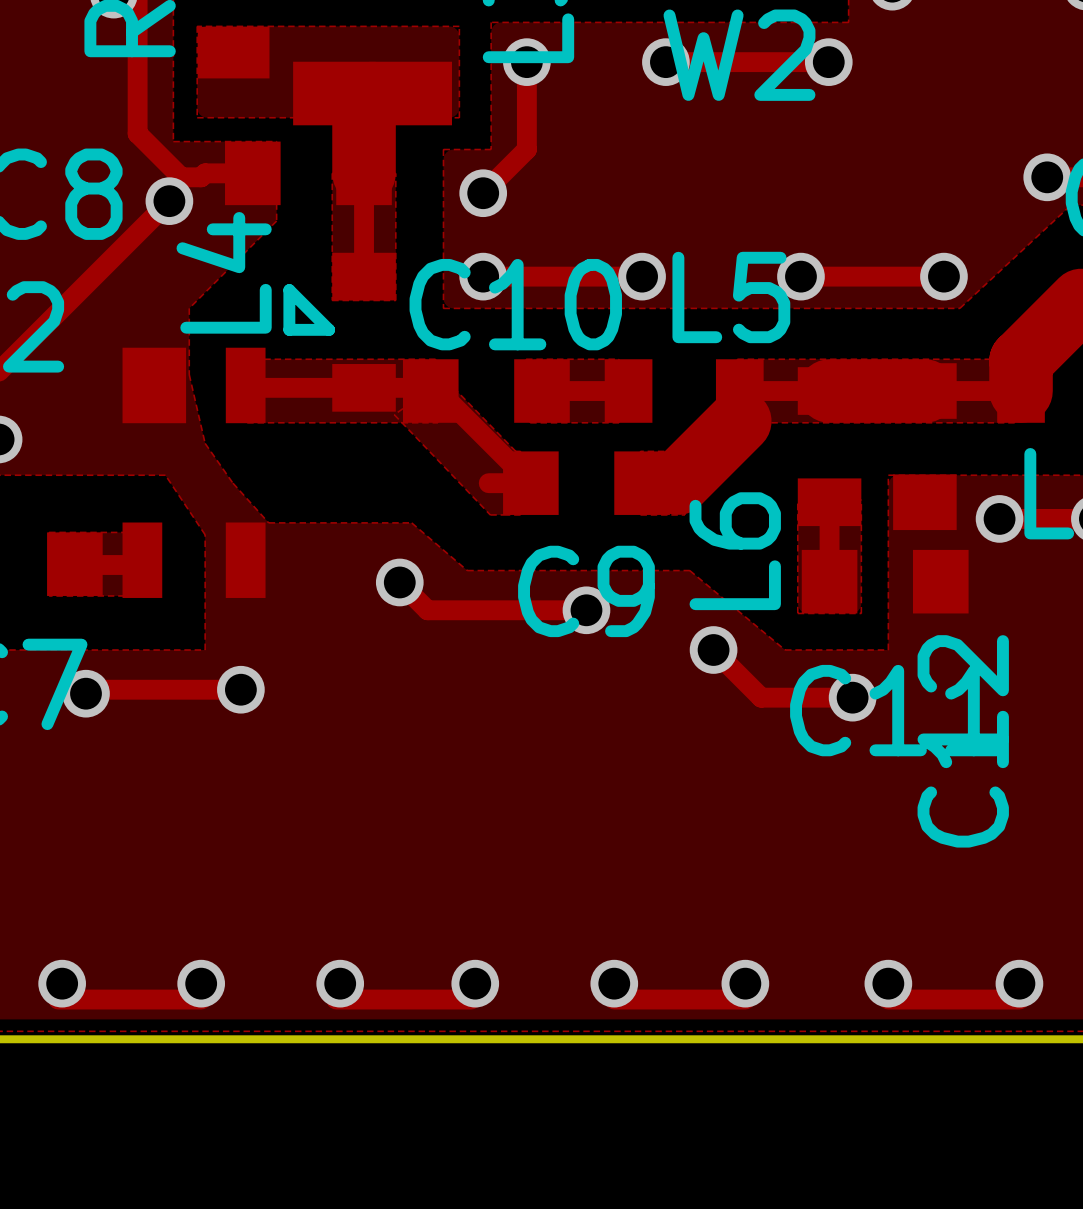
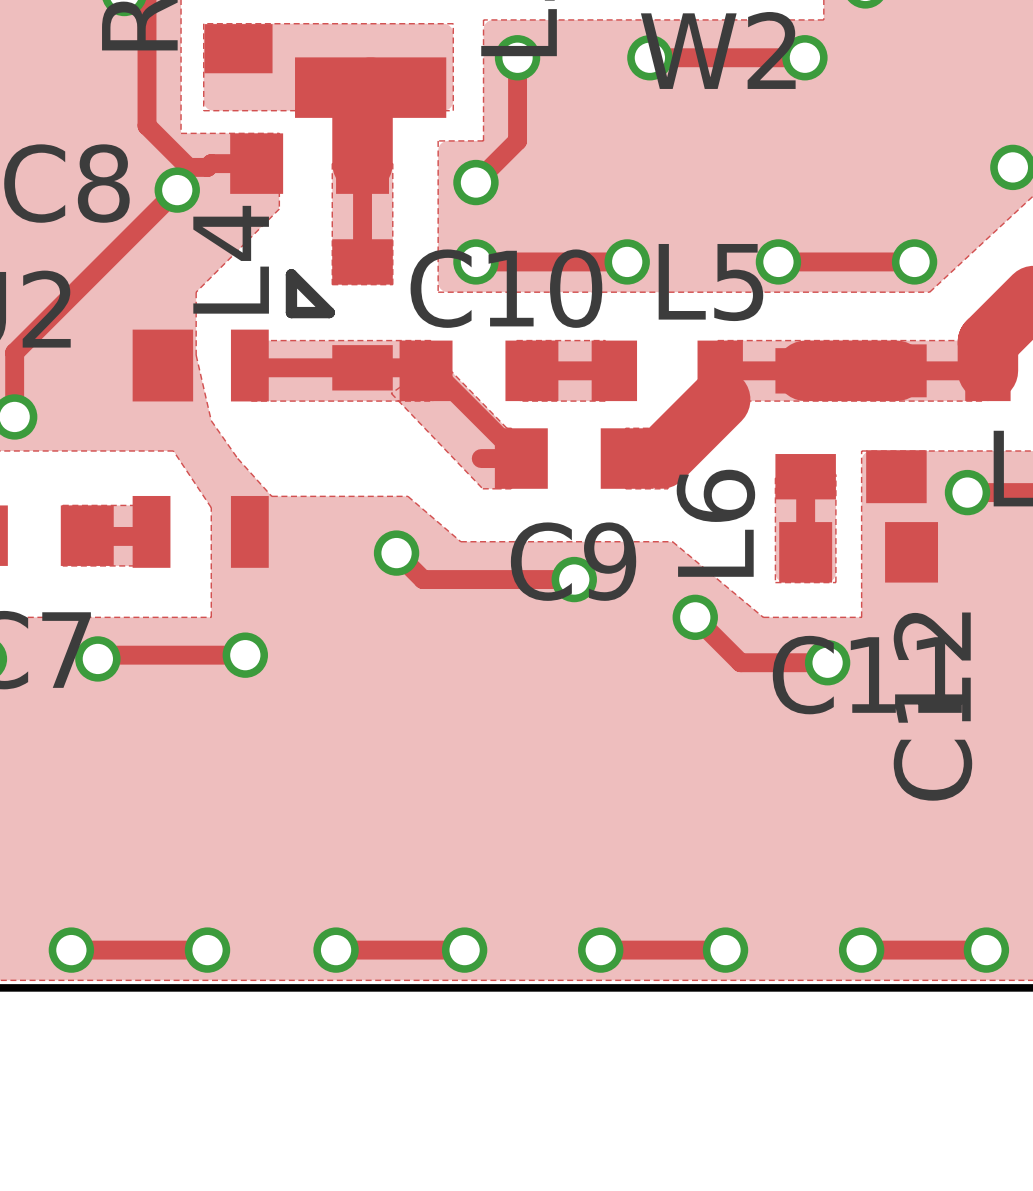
via position: (62, 983) -> (71, 950)
via position: (201, 983) -> (207, 950)
via position: (340, 983) -> (336, 950)
via position: (475, 983) -> (464, 950)
via position: (614, 983) -> (600, 950)
via position: (745, 983) -> (725, 950)
via position: (888, 983) -> (861, 950)
via position: (1019, 983) -> (986, 950)

